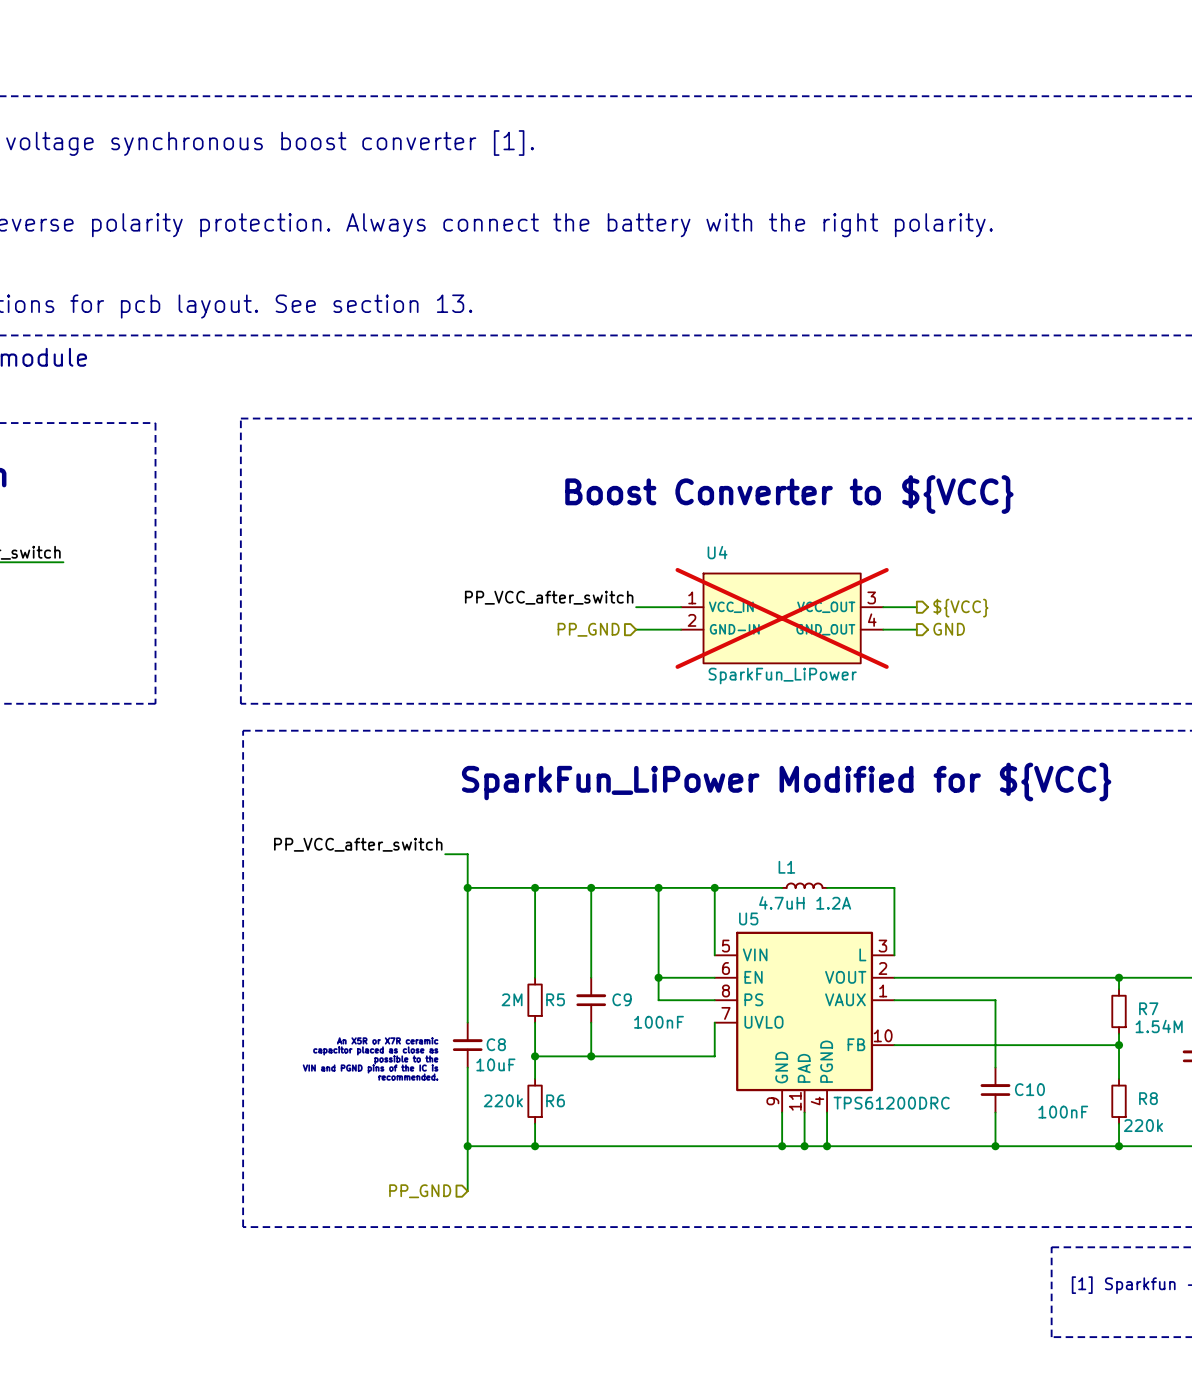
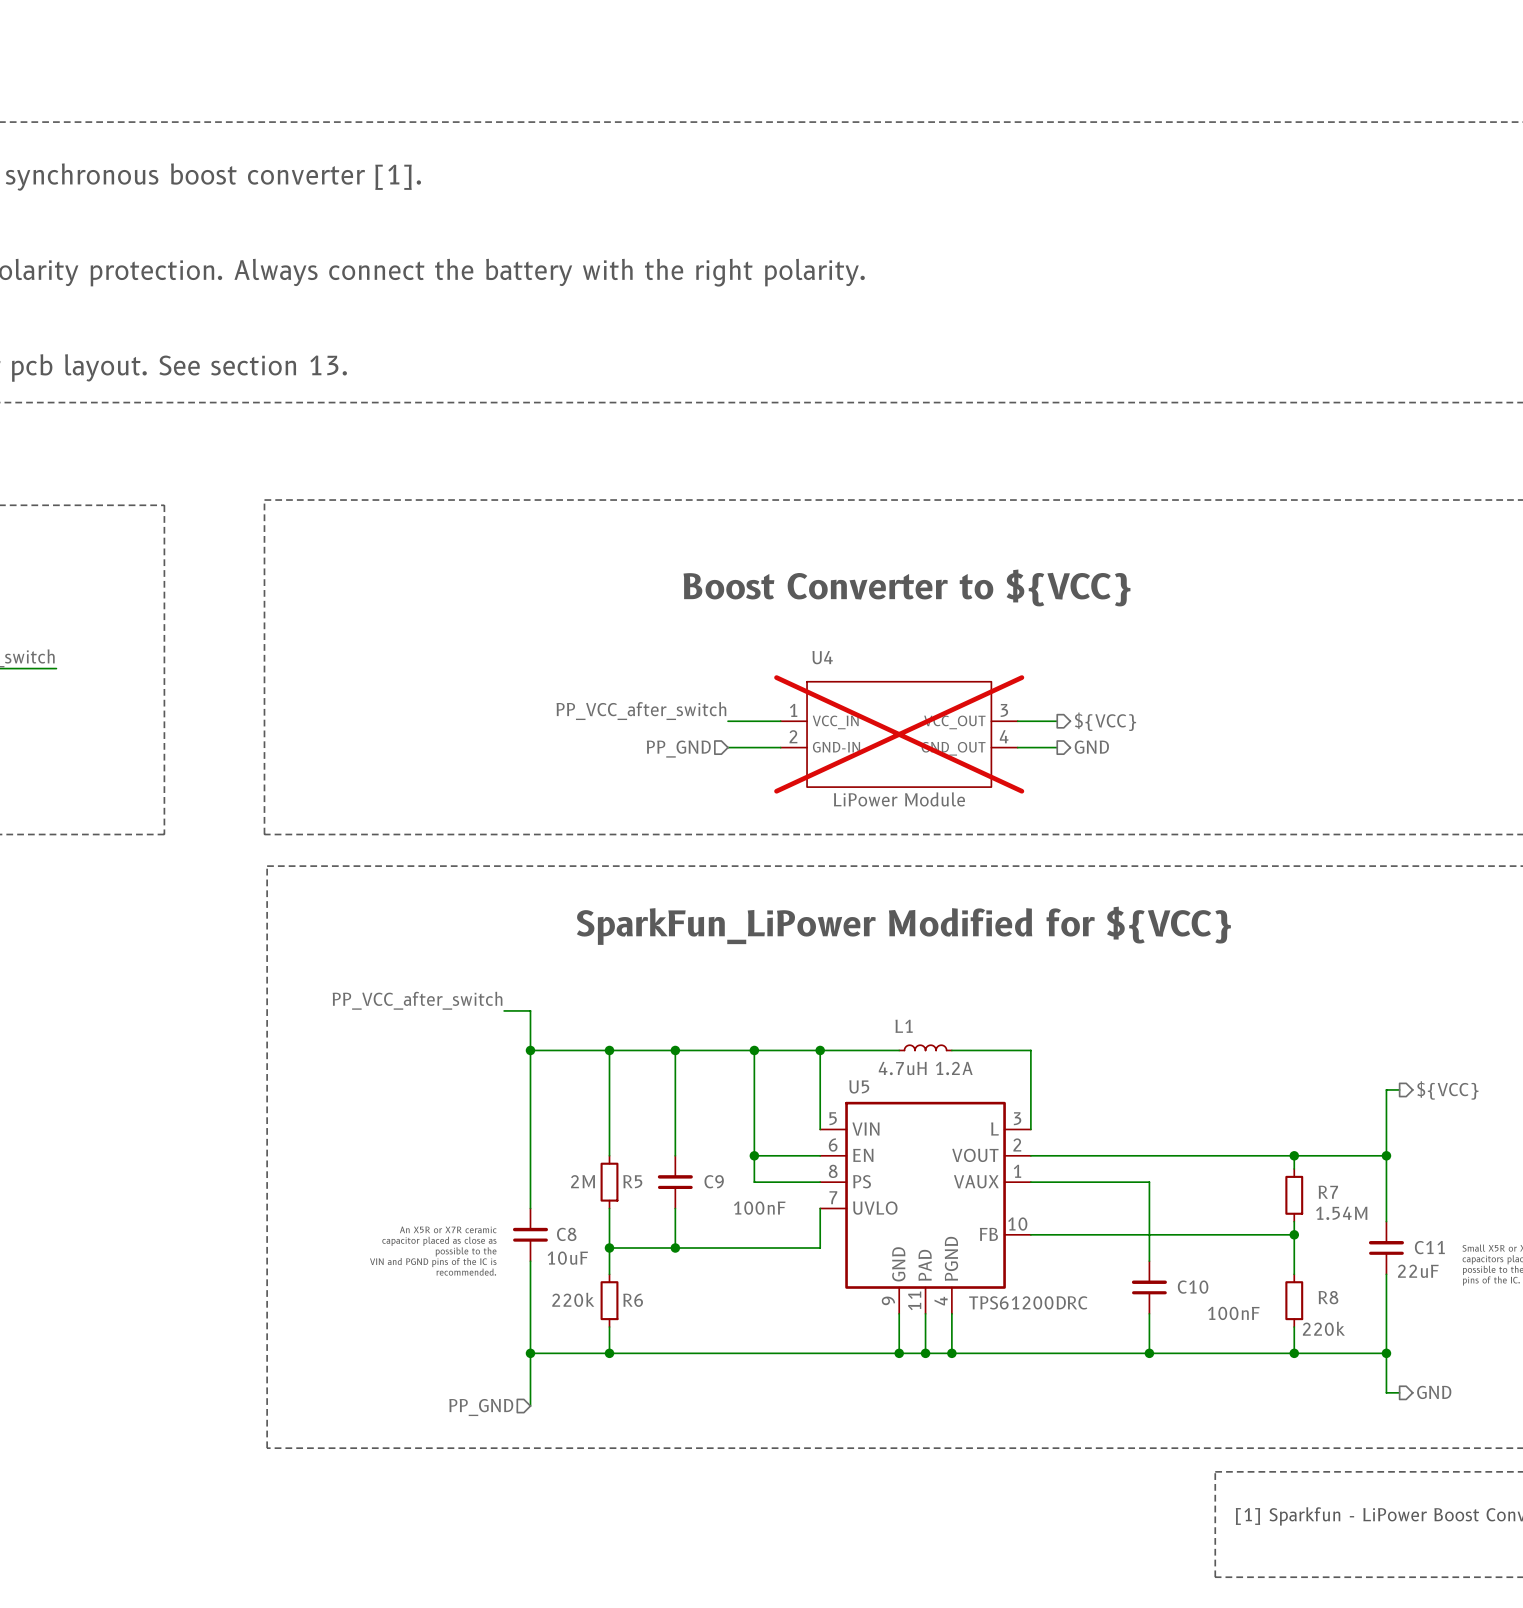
U4 value: SparkFun_LiPower (782, 676) -> LiPower Module (899, 799)

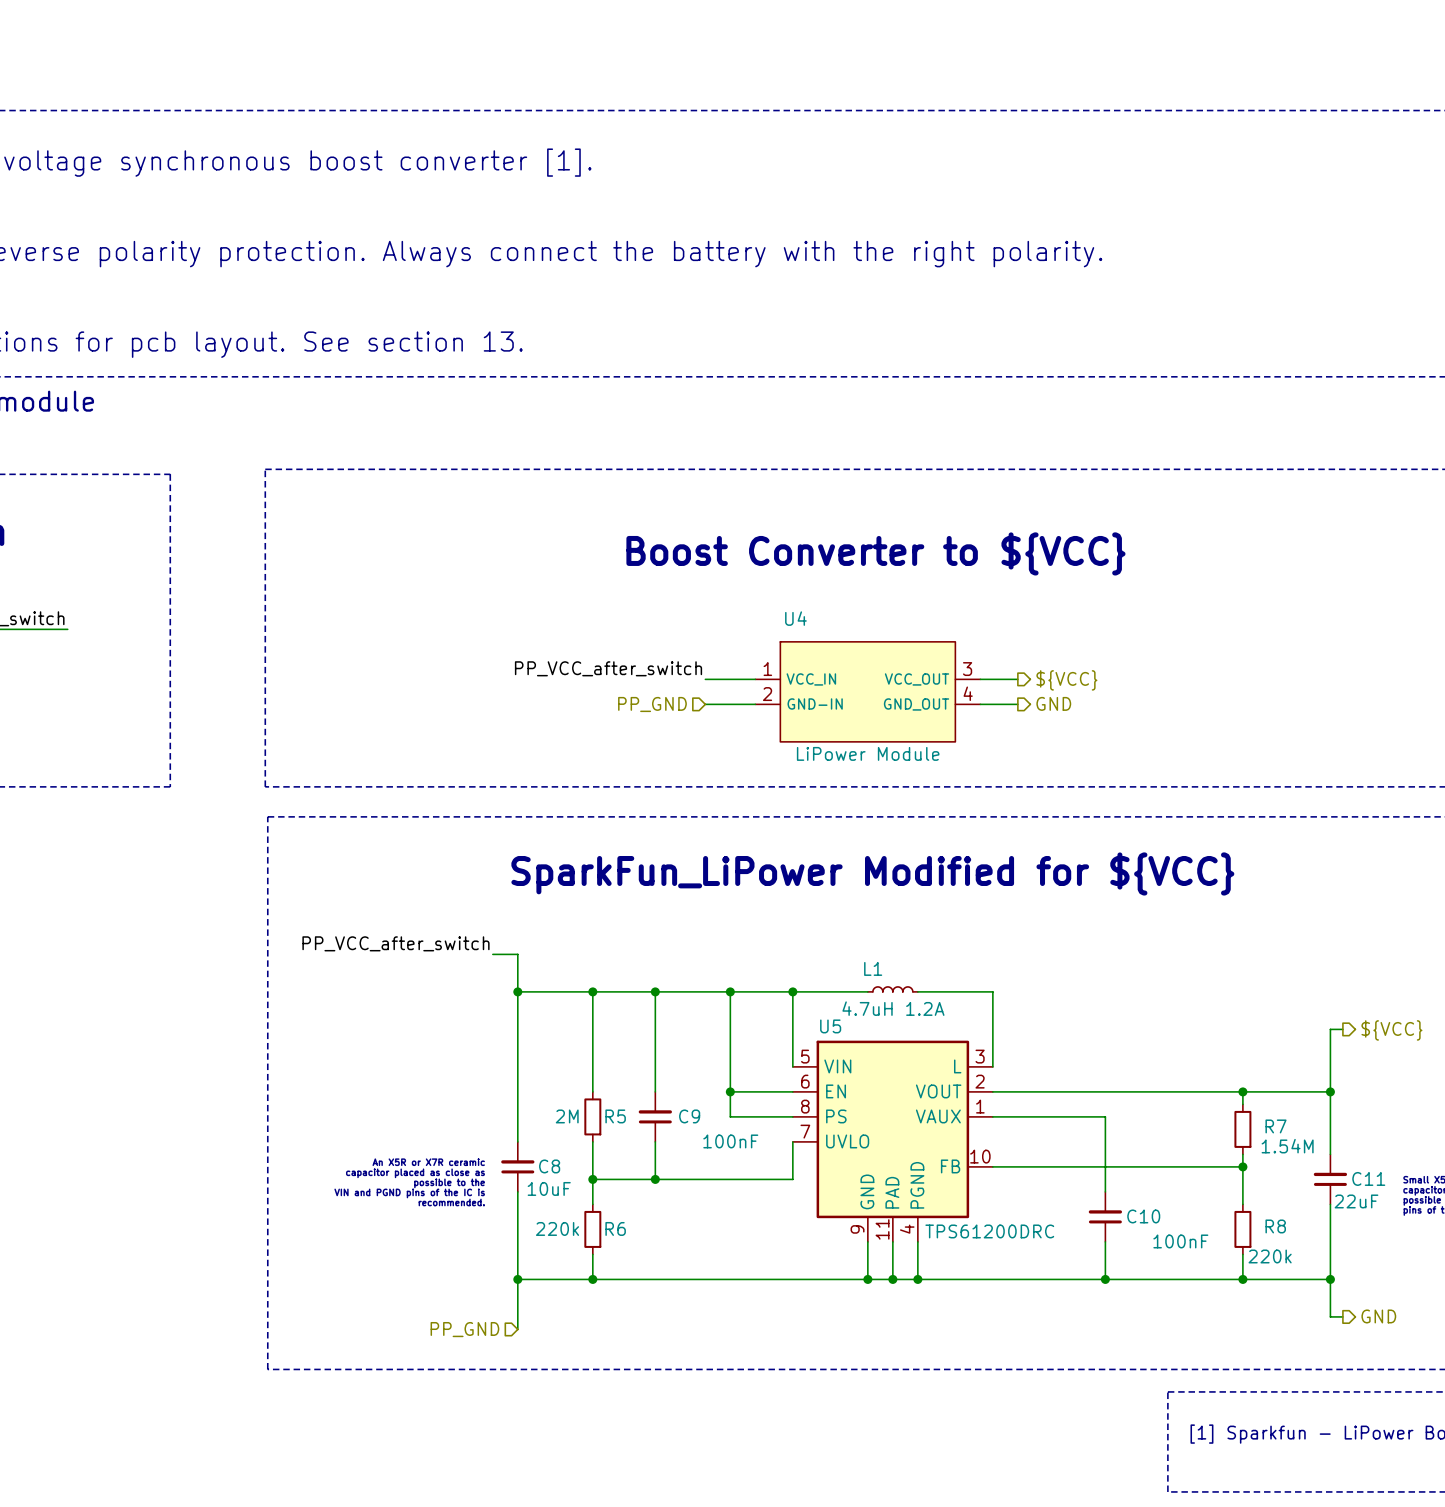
U4 do-not-place cross: (899, 734) -> none

